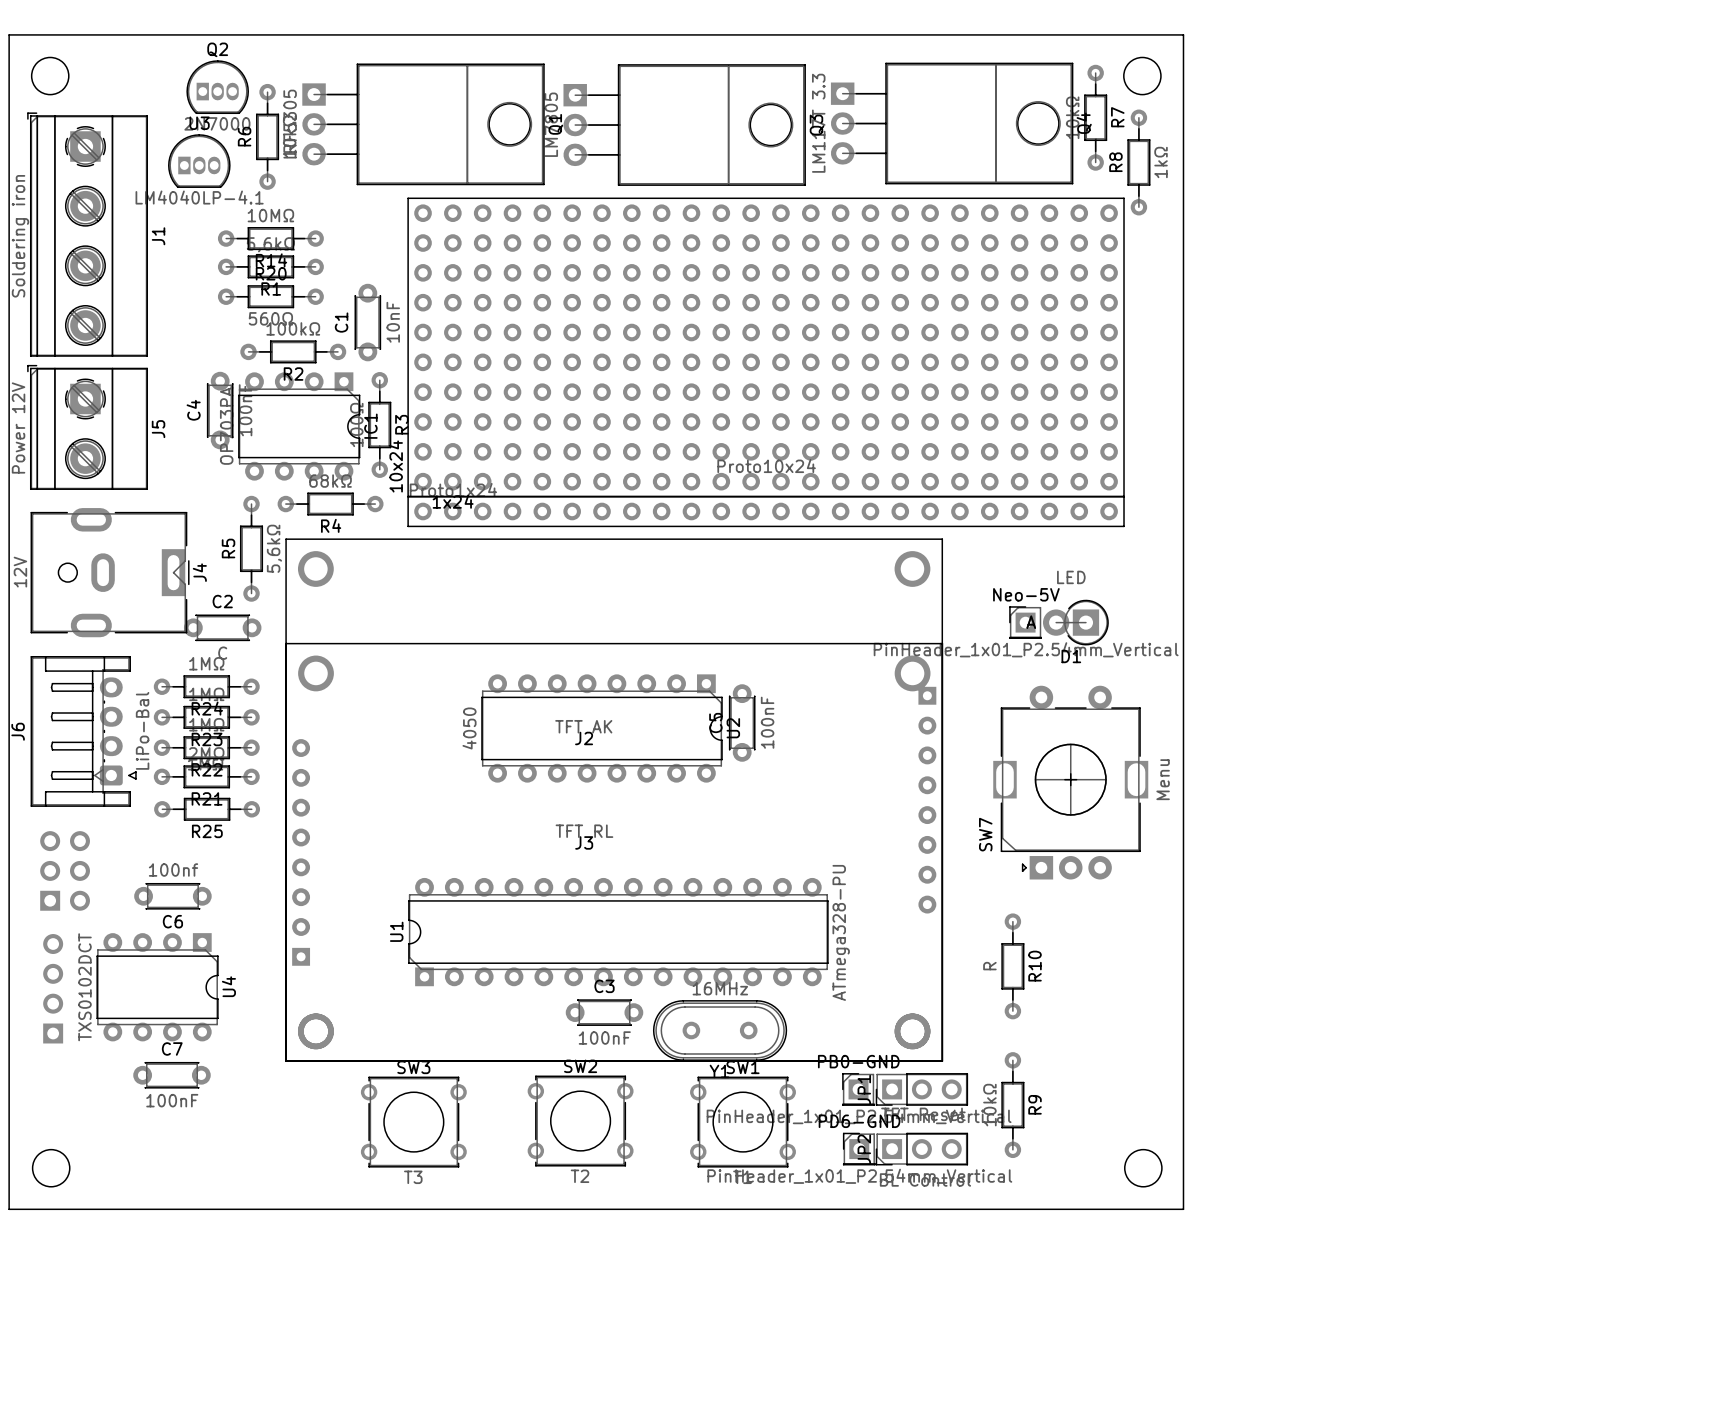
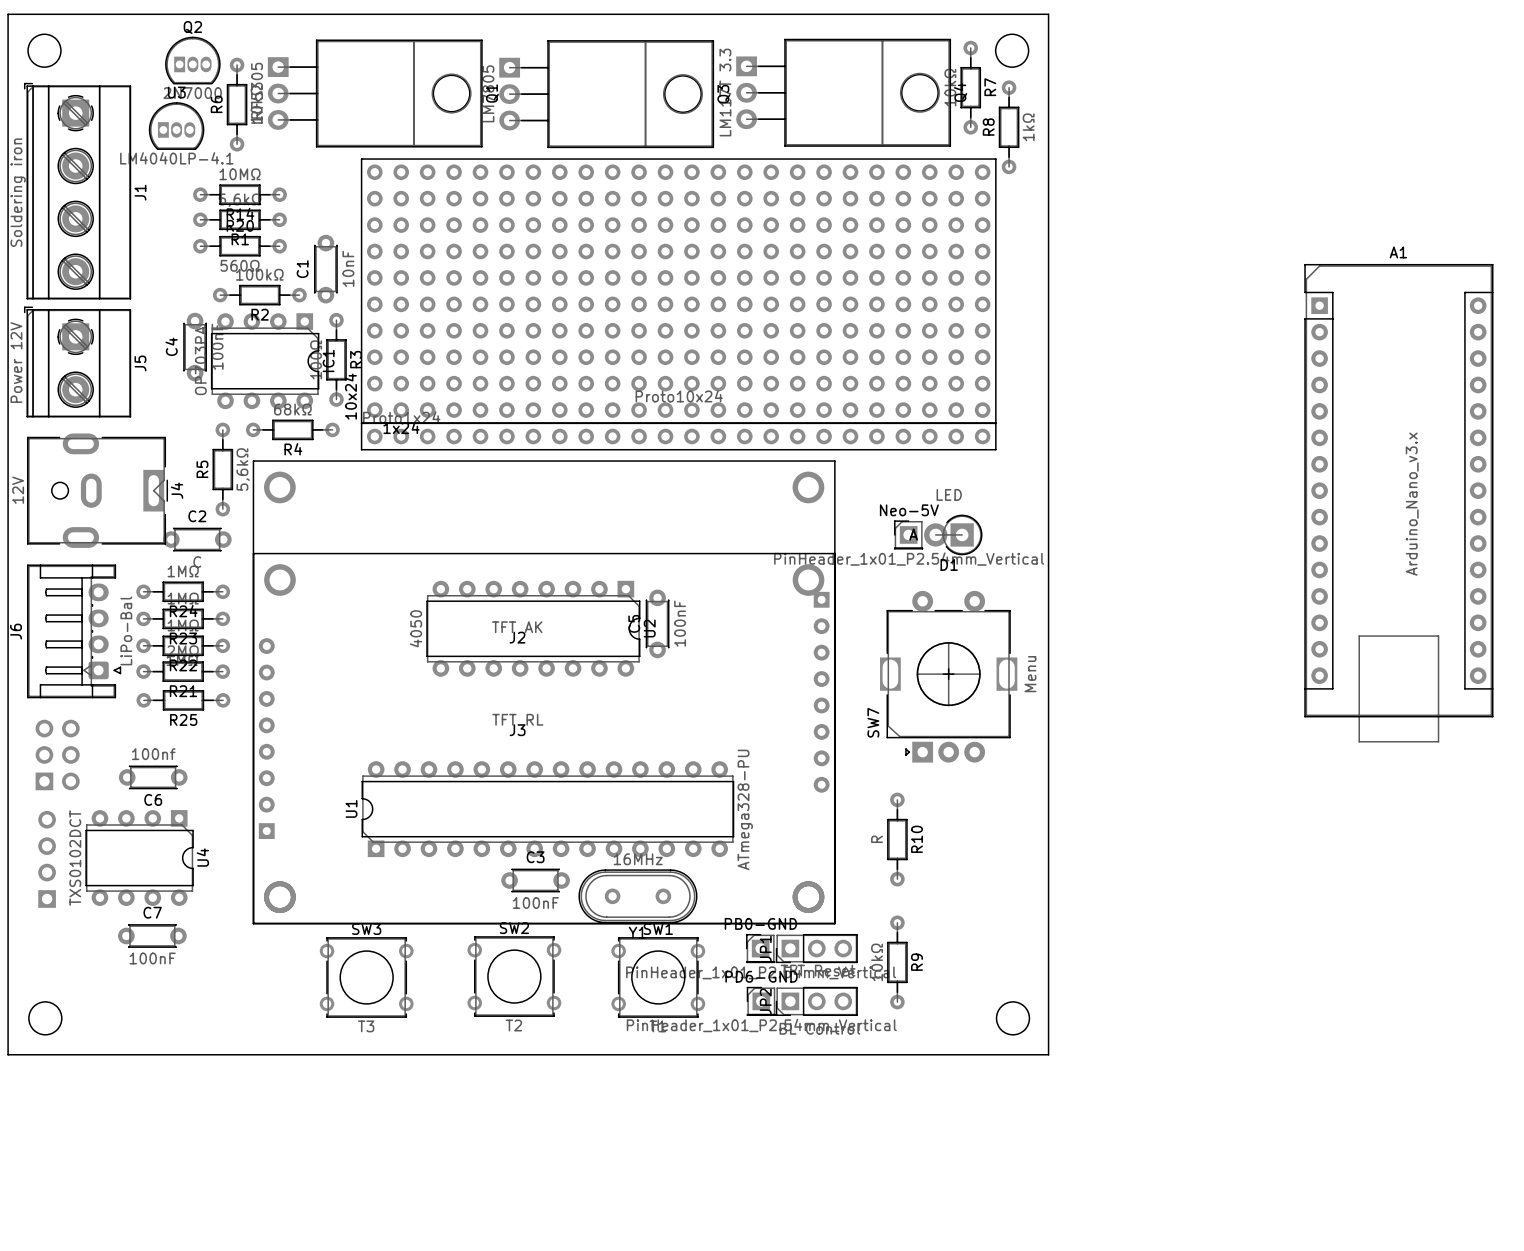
A1: none -> Arduino_Nano_v3.x (1398, 503)

